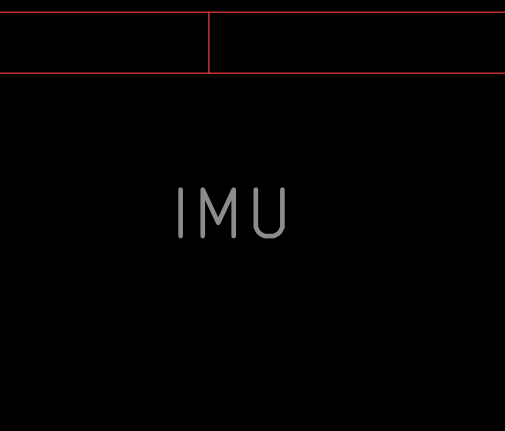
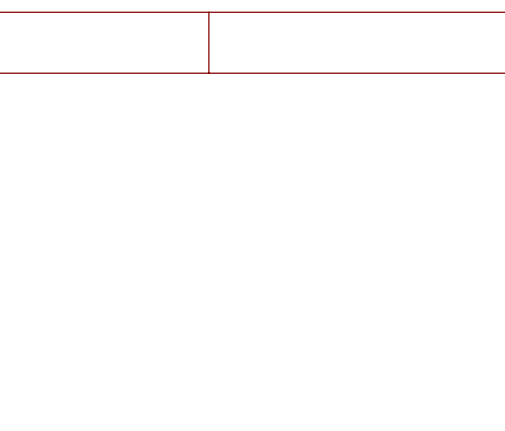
text: IMU (231, 212) -> none

